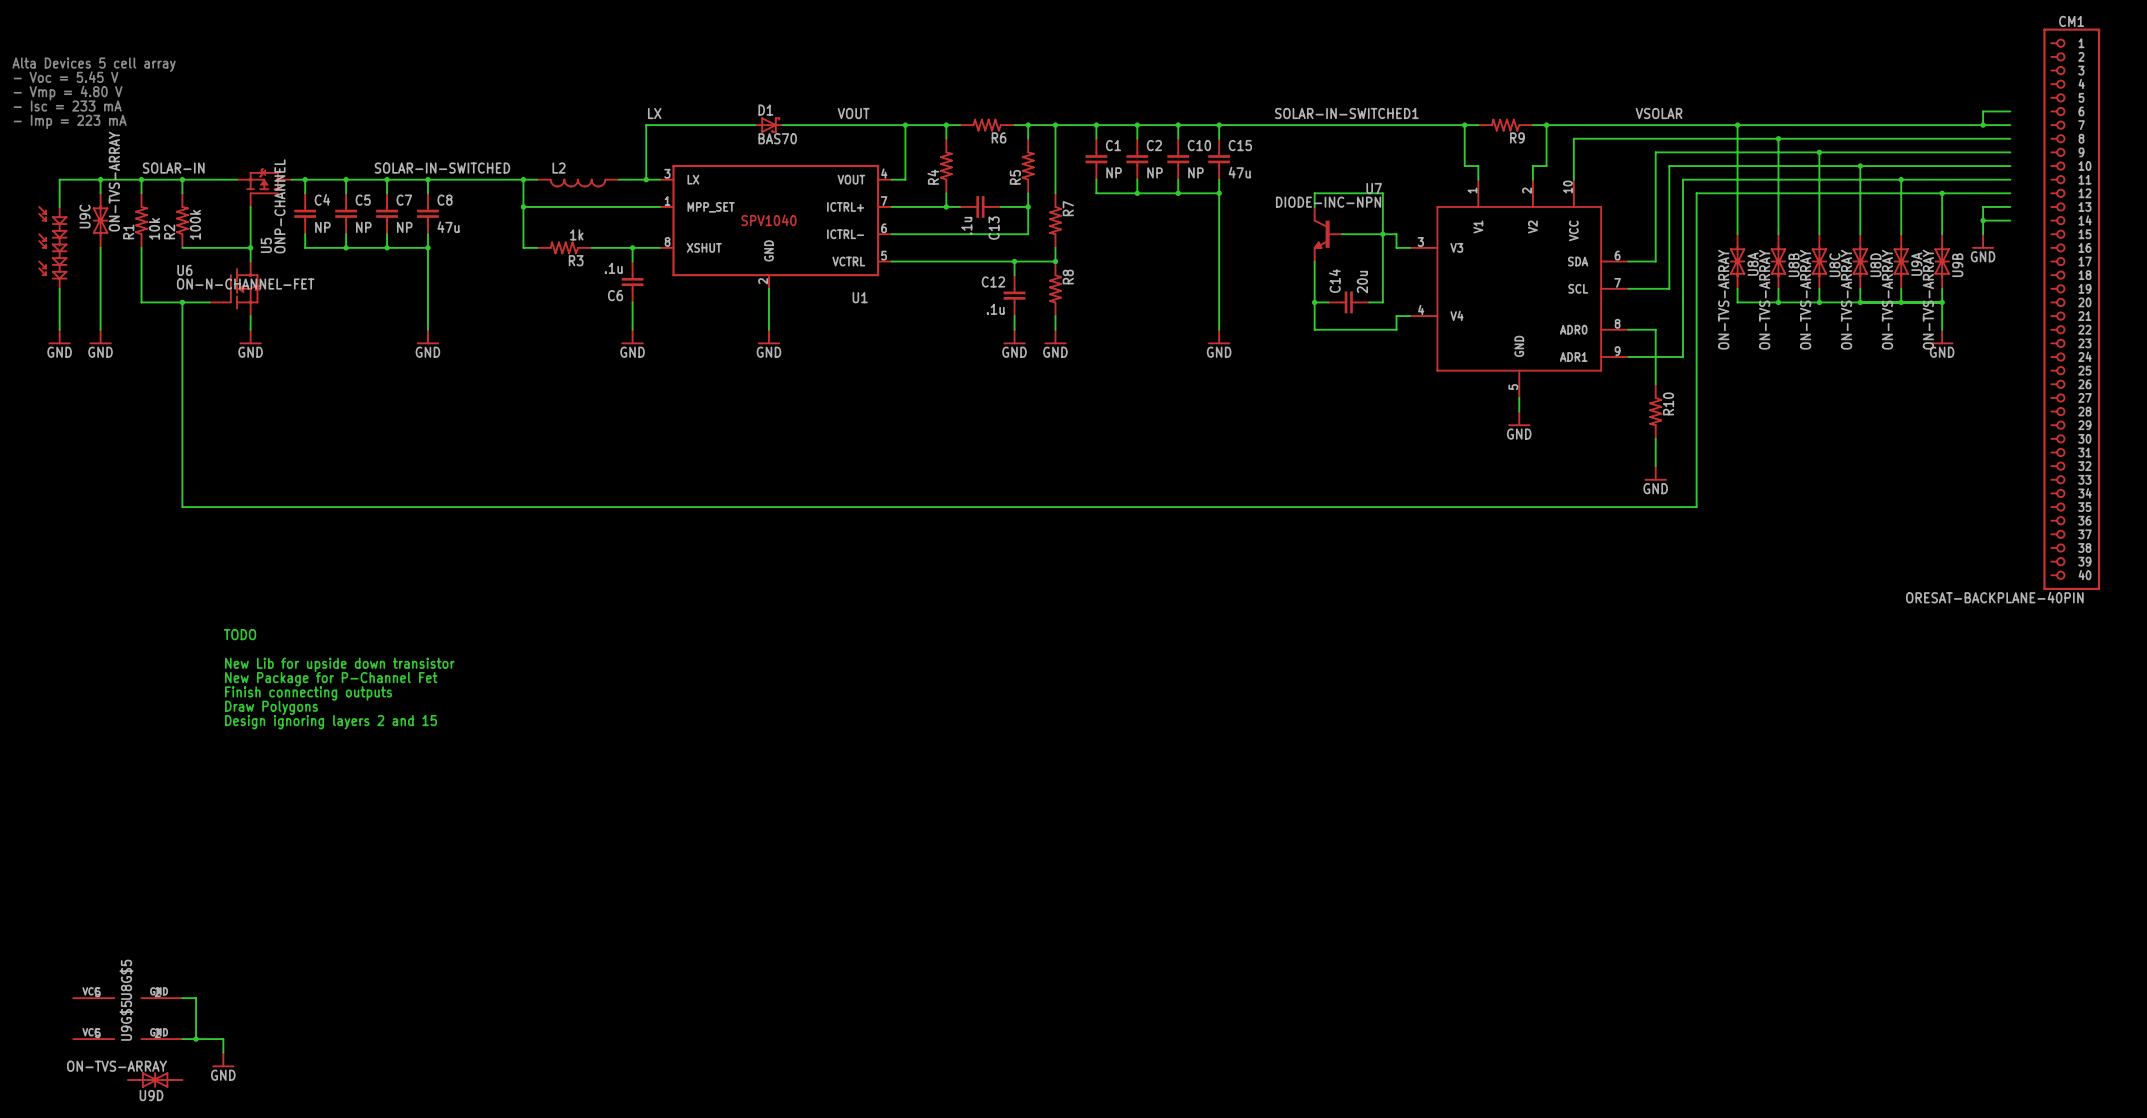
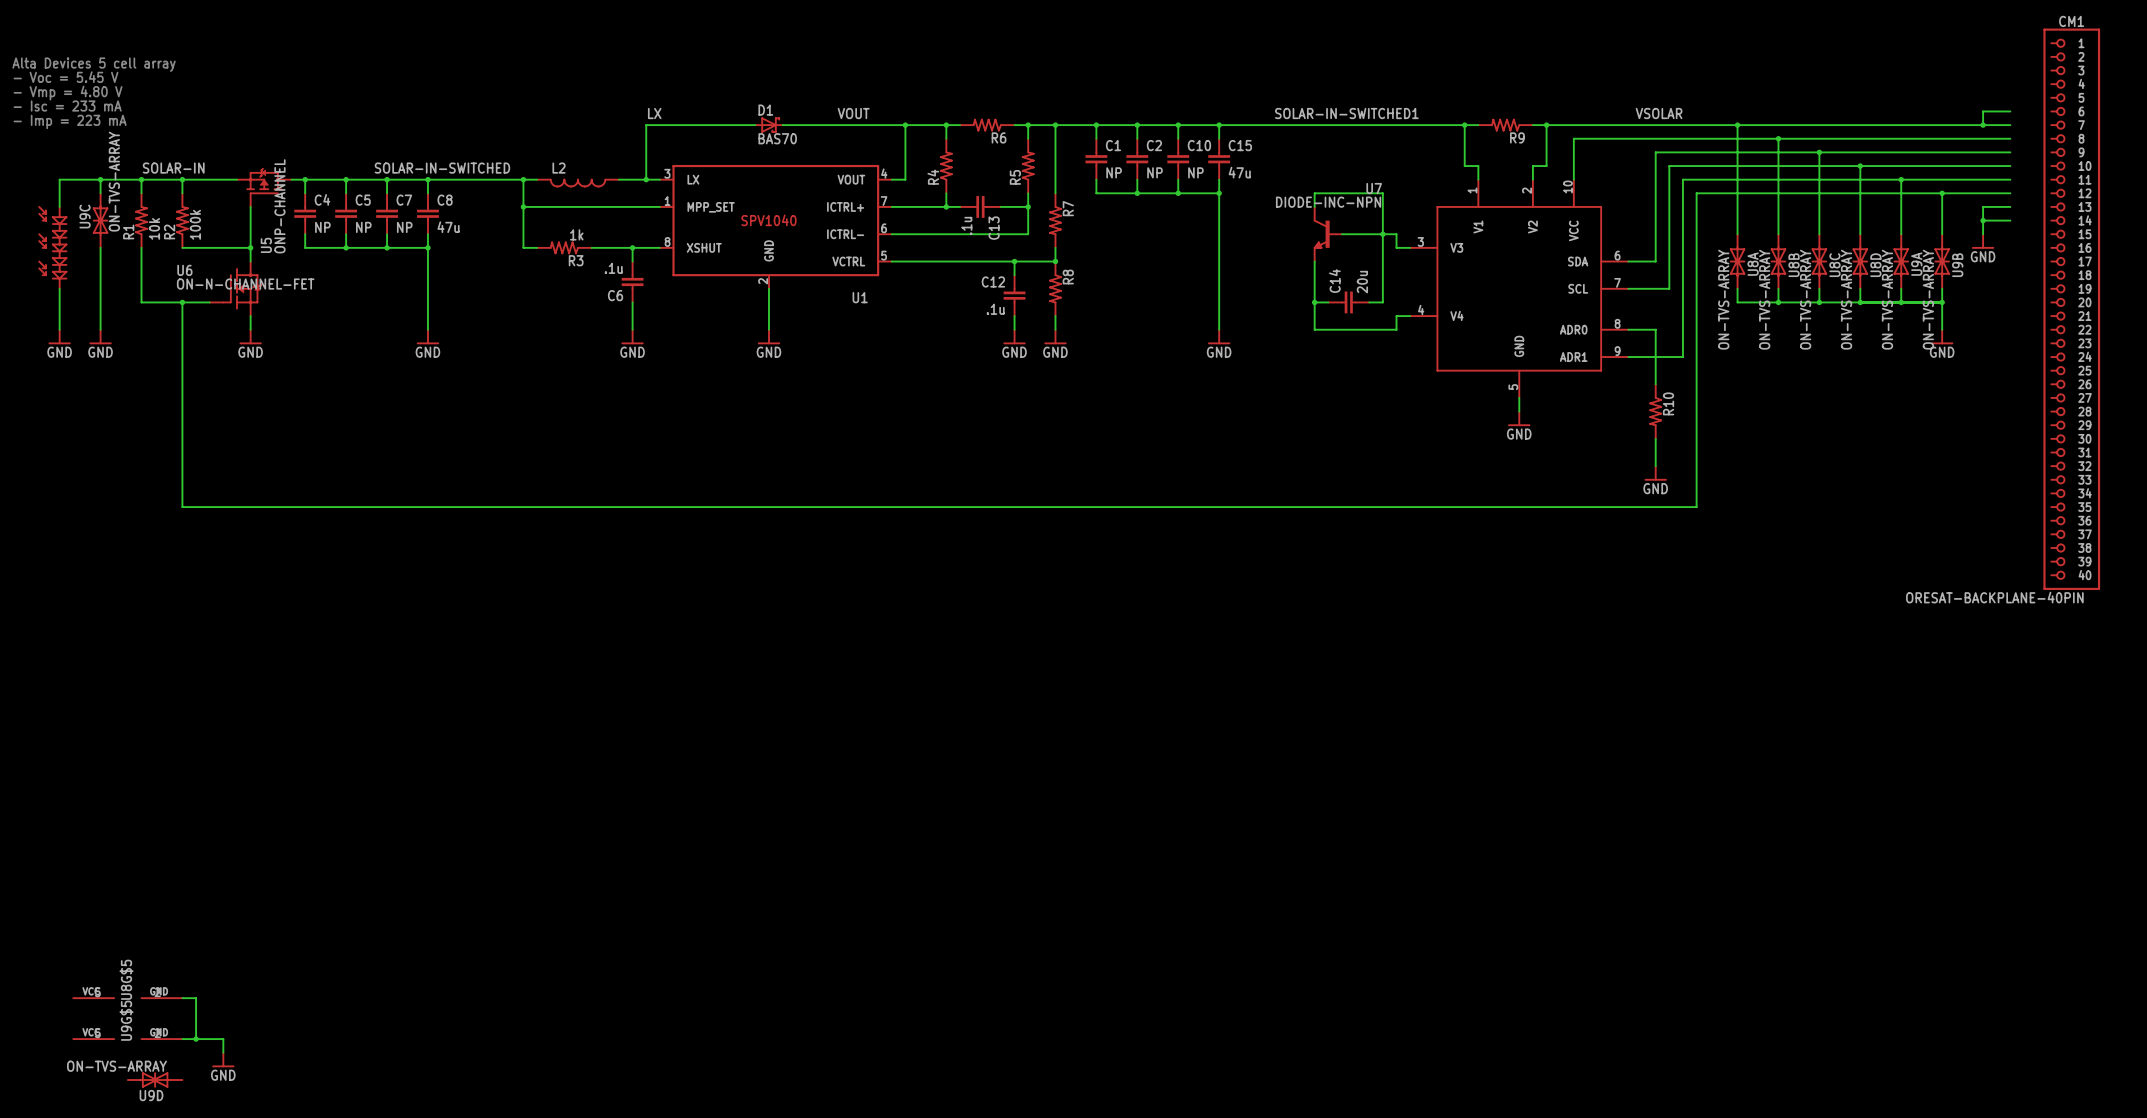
text: TODO (240, 634) -> none
text: New Lib for upside down transistor (339, 664) -> none
text: New Package for P-Channel Fet (331, 679) -> none
text: Finish connecting outputs (308, 693) -> none
text: Draw Polygons (271, 707) -> none
text: Design ignoring layers 2 and 15 (331, 722) -> none

